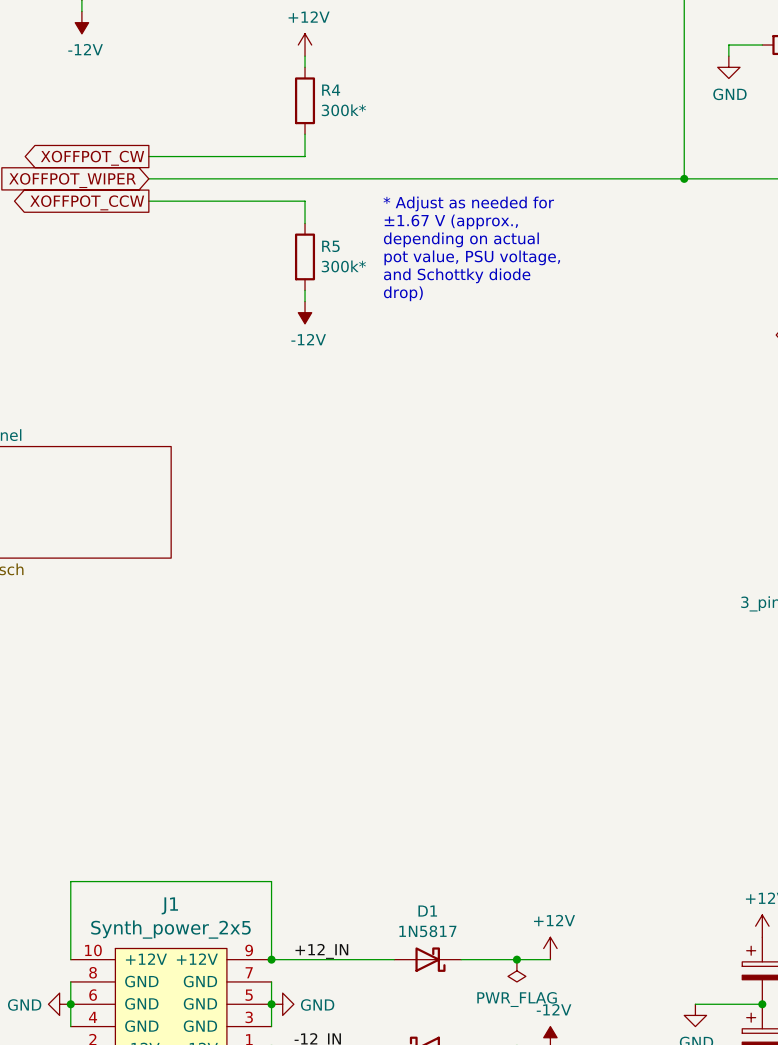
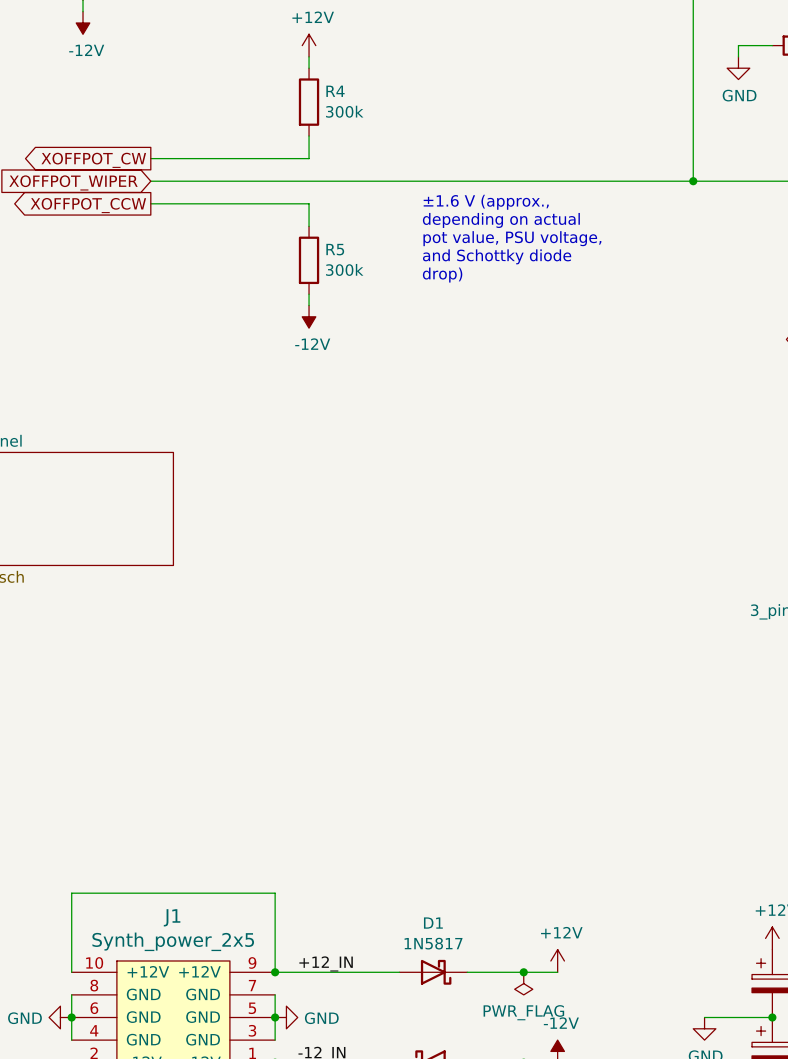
R4 value: 300k* (343, 110) -> 300k (344, 111)
text: * Adjust as needed for (468, 203) -> none
text: ±1.67 V (approx., (451, 221) -> ±1.6 V (approx., (486, 202)
text position: depending on actual (461, 239) -> depending on actual (501, 220)
text position: pot value, PSU voltage, (472, 257) -> pot value, PSU voltage, (512, 238)
R5 value: 300k* (343, 266) -> 300k (344, 269)
text position: and Schottky diode (457, 275) -> and Schottky diode (497, 256)
text position: drop) (403, 293) -> drop) (442, 275)

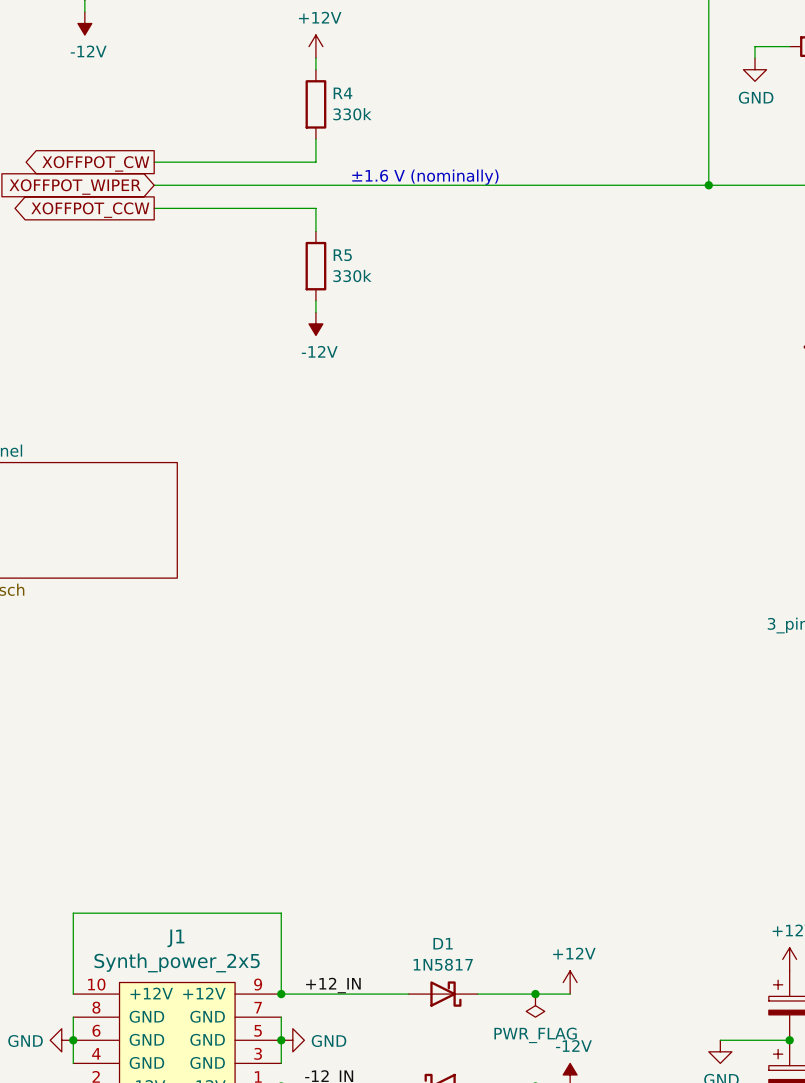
R4 value: 300k (344, 111) -> 330k (352, 114)
text: none -> ±1.6 V (nominally) (425, 177)
text: ±1.6 V (approx., (486, 202) -> none
text: depending on actual (501, 220) -> none
text: pot value, PSU voltage, (512, 238) -> none
text: and Schottky diode (497, 256) -> none
R5 value: 300k (344, 269) -> 330k (352, 275)
text: drop) (442, 275) -> none

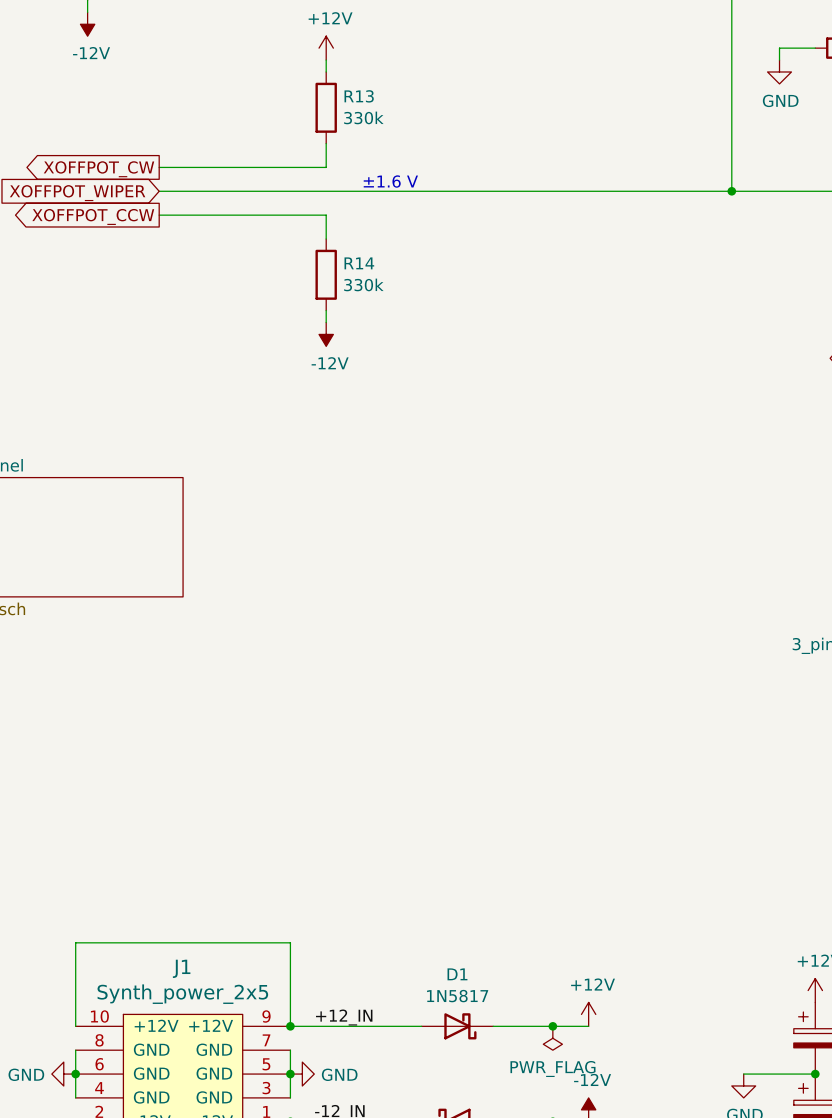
R4 name: R4 (343, 93) -> R13 (359, 96)
text: ±1.6 V (nominally) (425, 177) -> ±1.6 V (390, 181)
R5 name: R5 (342, 255) -> R14 (359, 263)

